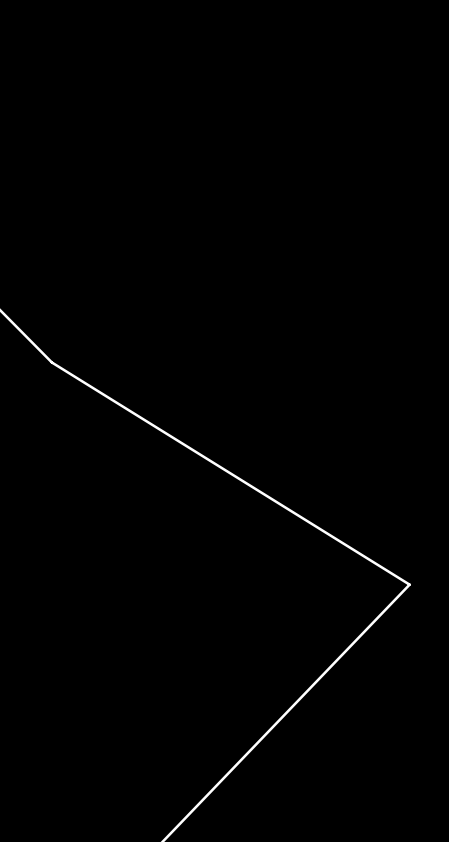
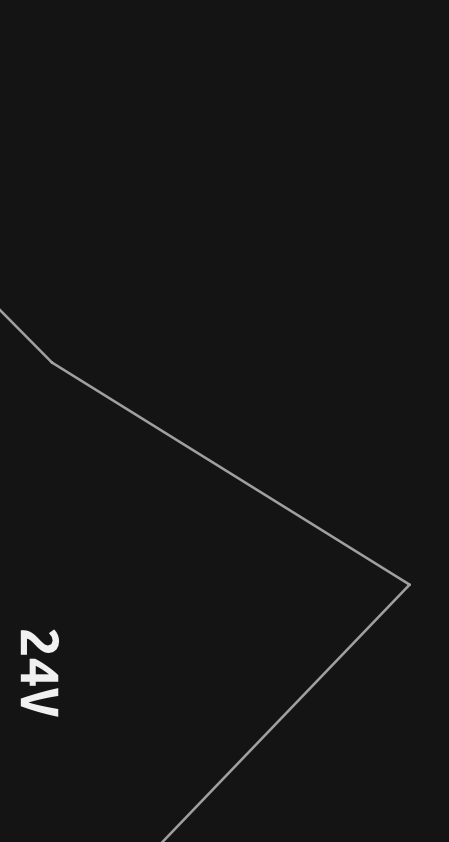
drawing: none -> [20, 629, 60, 717]

